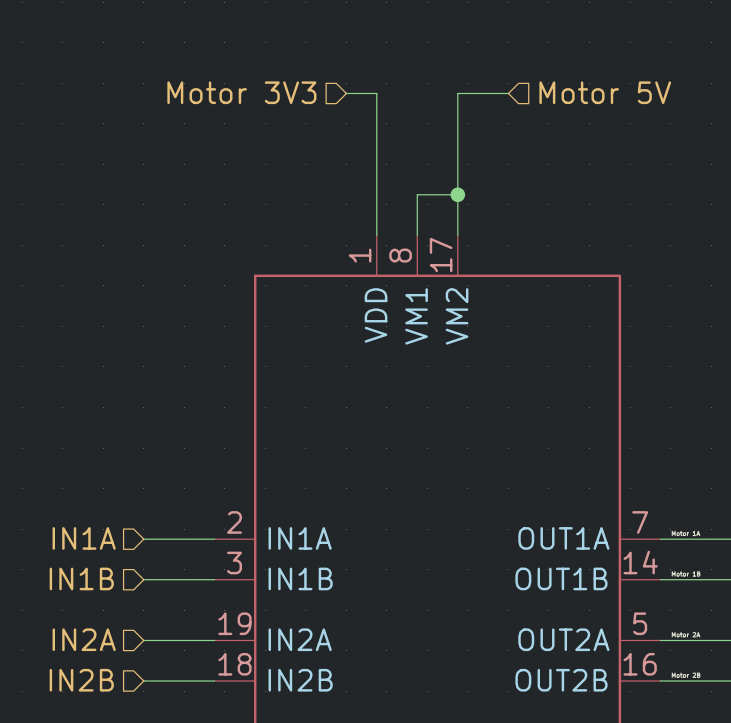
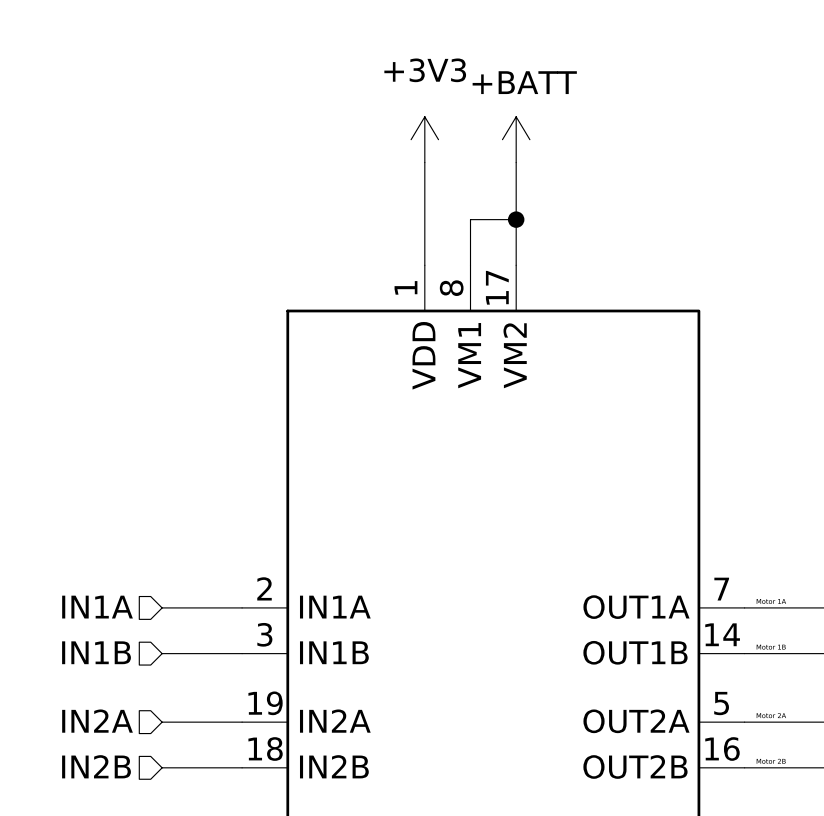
hierarchical label: Motor 3V3 (241, 92) -> none
hierarchical label: Motor 5V (605, 92) -> none
wire: (346, 93) (376, 93) (376, 144) -> none
wire: (508, 93) (457, 93) (457, 144) -> none
power symbol: none -> +3V3 (424, 139)
power symbol: none -> +BATT (516, 139)

